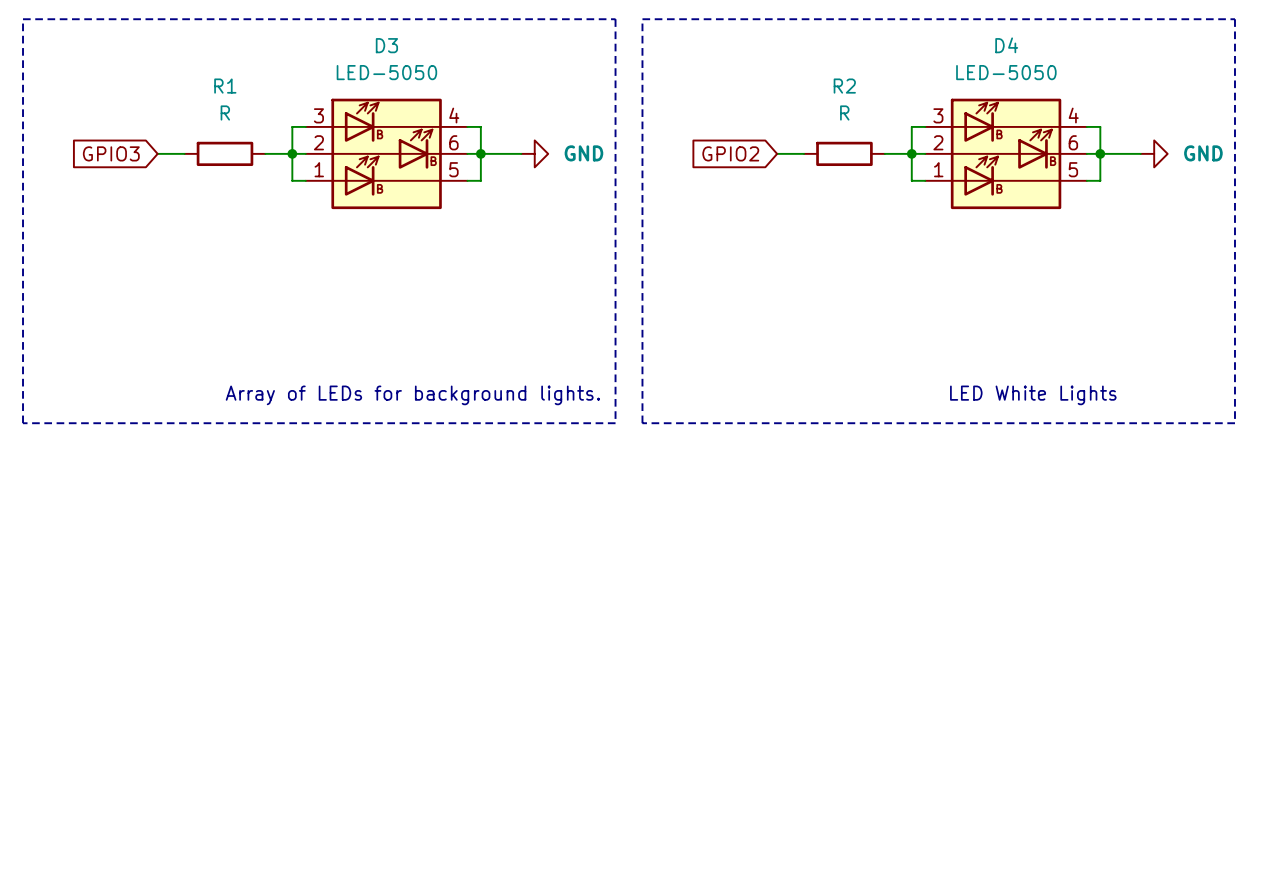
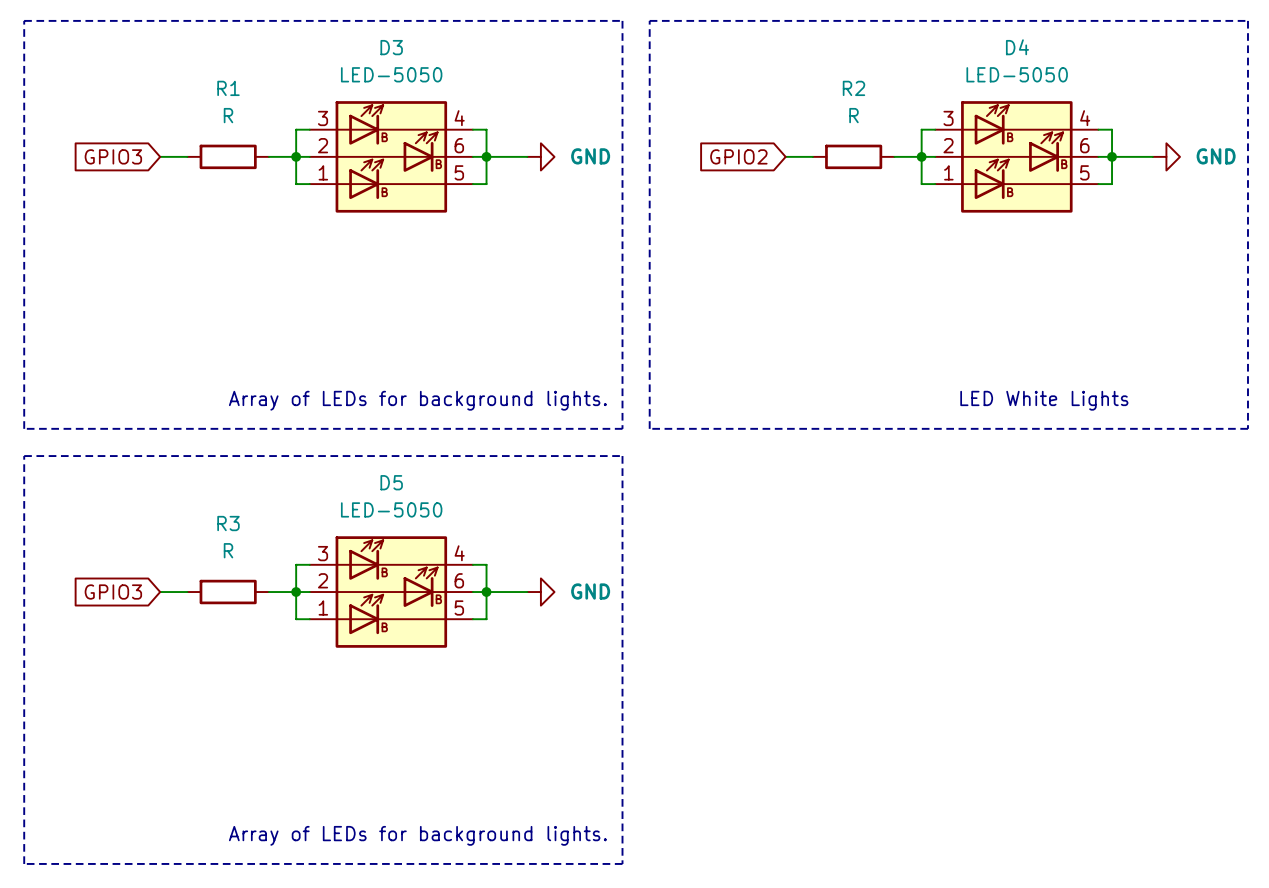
line: none -> (24, 456) (622, 456) (622, 863) (24, 863) (24, 456)
wire: none -> (309, 564) (296, 564) (296, 619) (309, 619)
wire: none -> (472, 564) (486, 564) (486, 619) (472, 619)
global label: none -> GPIO3 (113, 592)
wire: none -> (160, 592) (187, 592)
R3: none -> R (228, 592)
wire: none -> (268, 592) (309, 592)
junction: none -> (296, 592)
D5: none -> LED-5050 (391, 592)
wire: none -> (472, 592) (527, 592)
junction: none -> (486, 592)
power symbol: none -> GND (540, 592)
text: none -> Array of LEDs for background lights. (417, 835)

